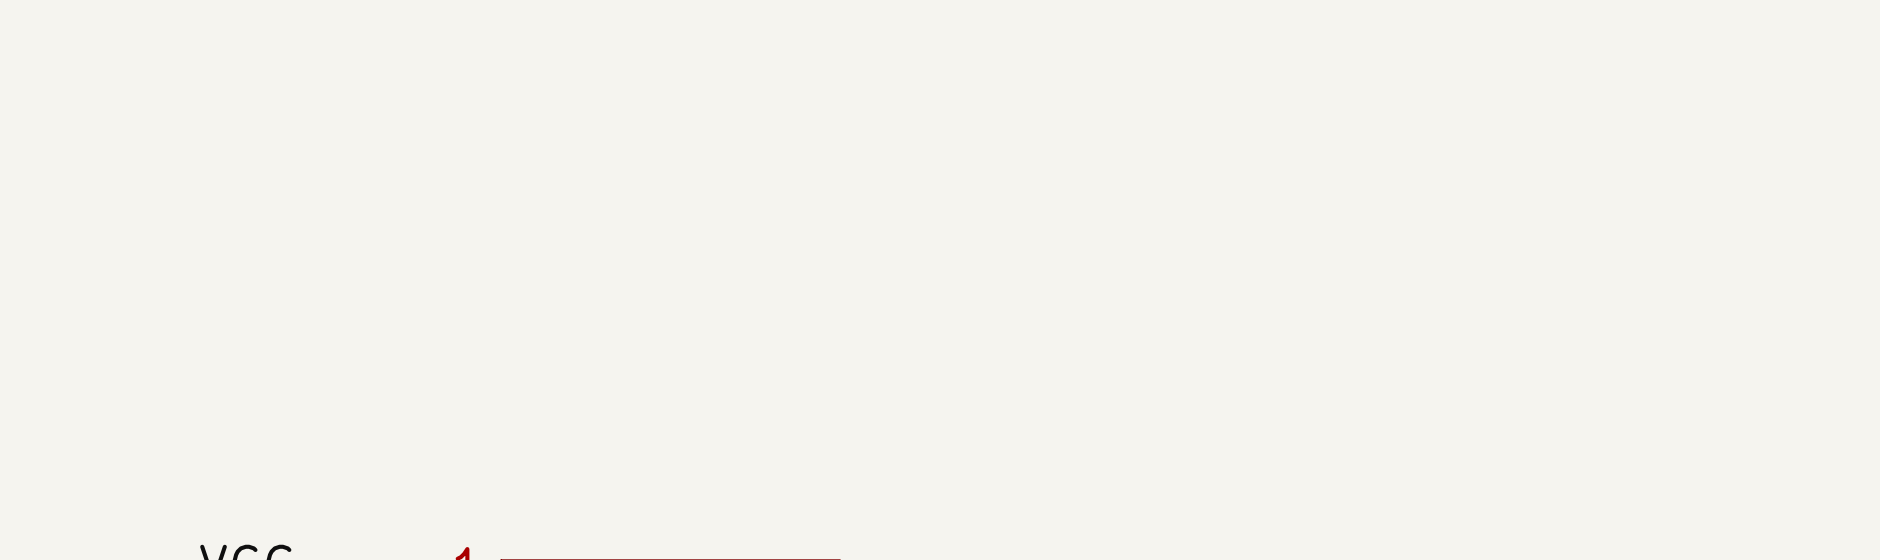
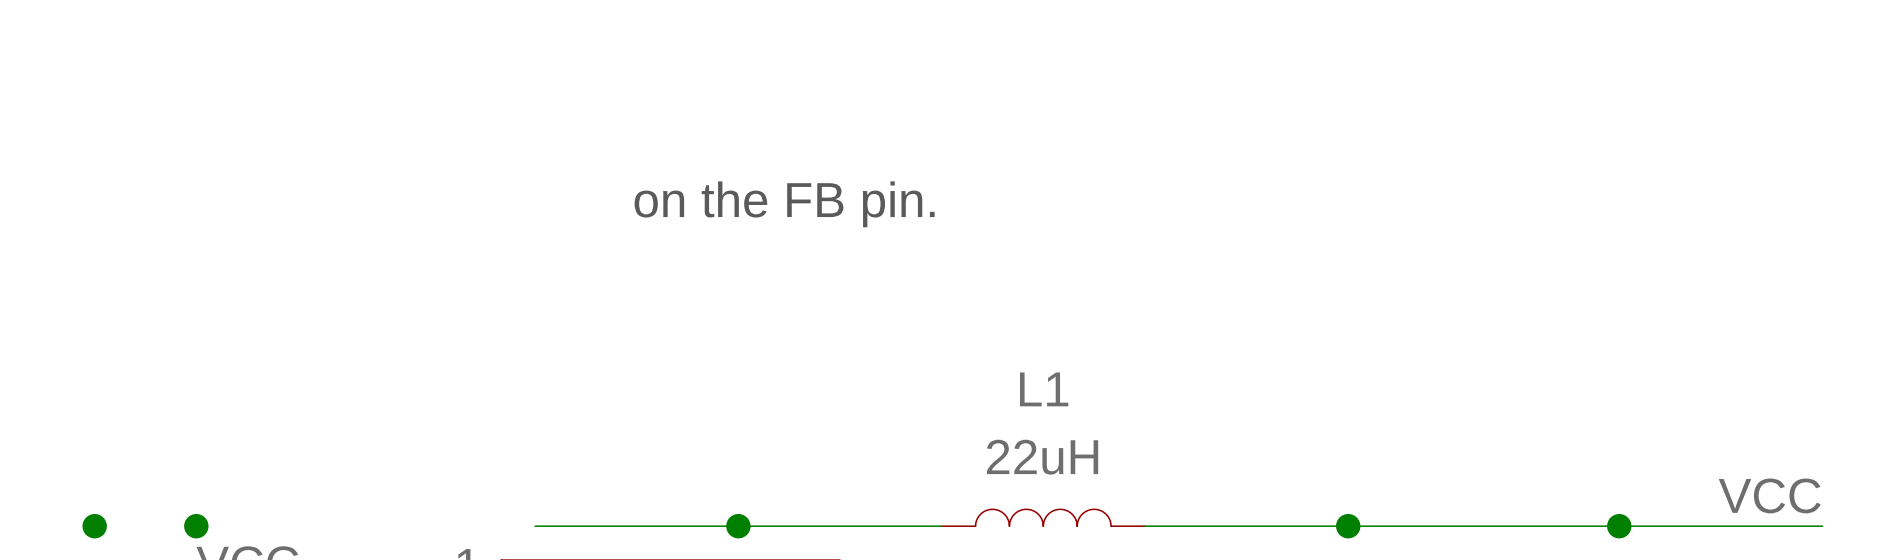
text: none -> on the FB pin. (784, 204)
label: none -> VCC (1769, 495)
L1: none -> 22uH (1043, 517)
junction: none -> (94, 526)
junction: none -> (196, 526)
wire: none -> (535, 526) (941, 526)
junction: none -> (738, 526)
wire: none -> (1144, 526) (1822, 526)
junction: none -> (1348, 526)
junction: none -> (1619, 526)

